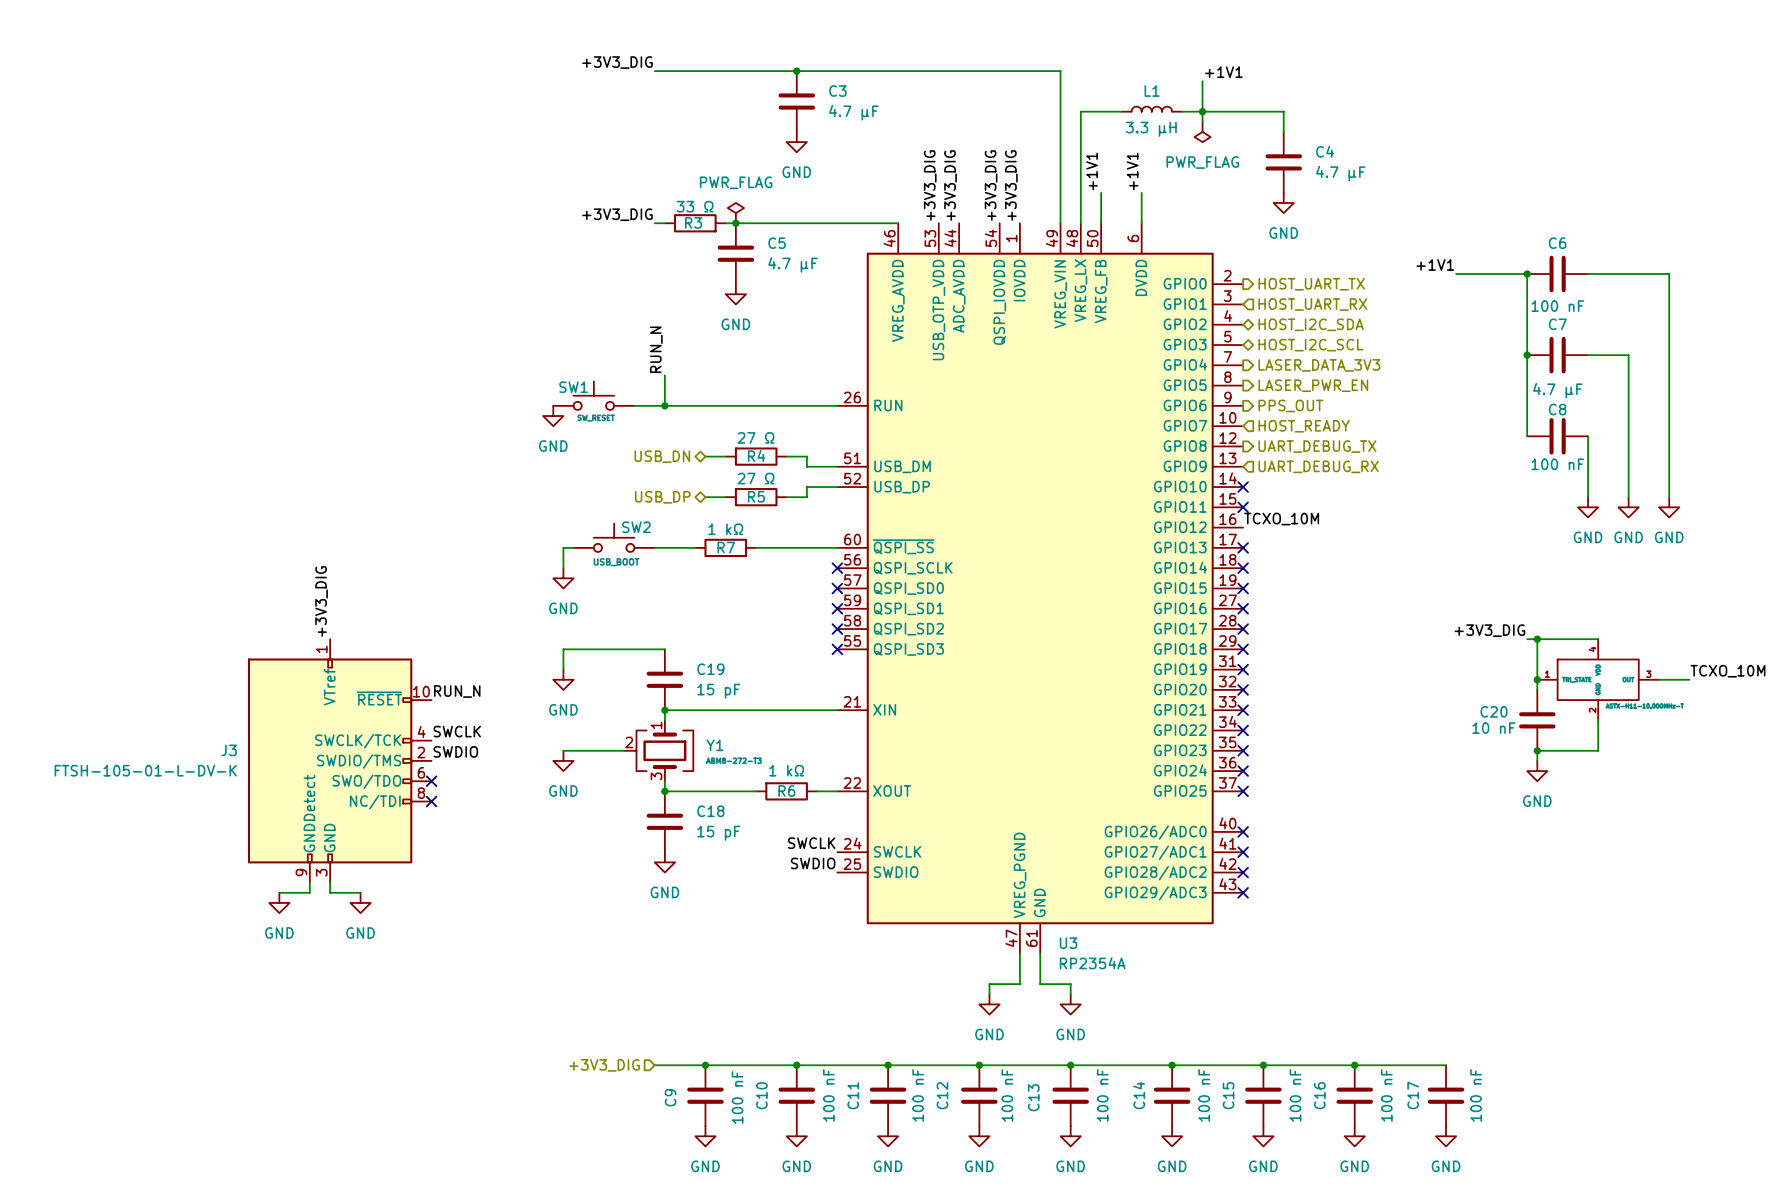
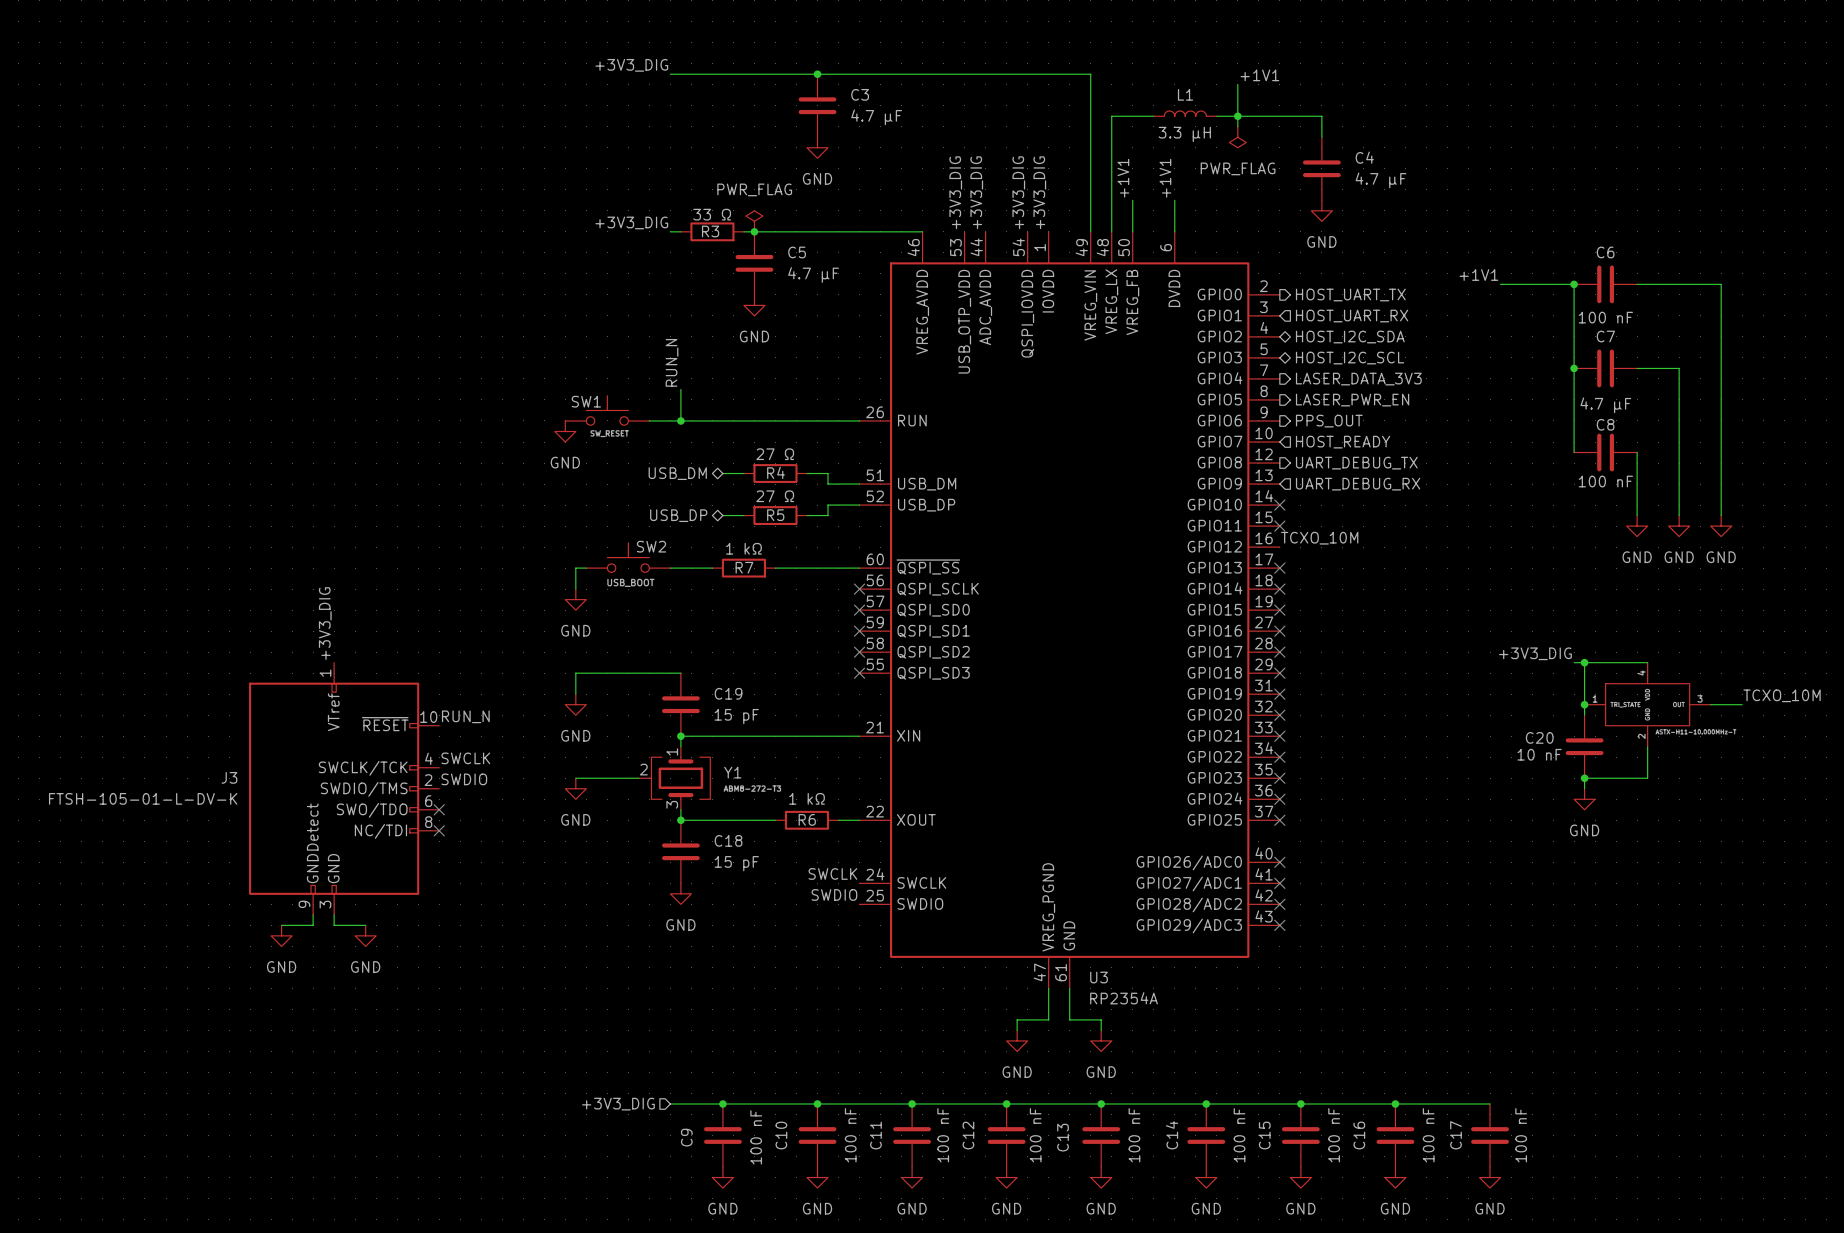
hierarchical label: USB_DN (662, 456) -> USB_DM (677, 473)

